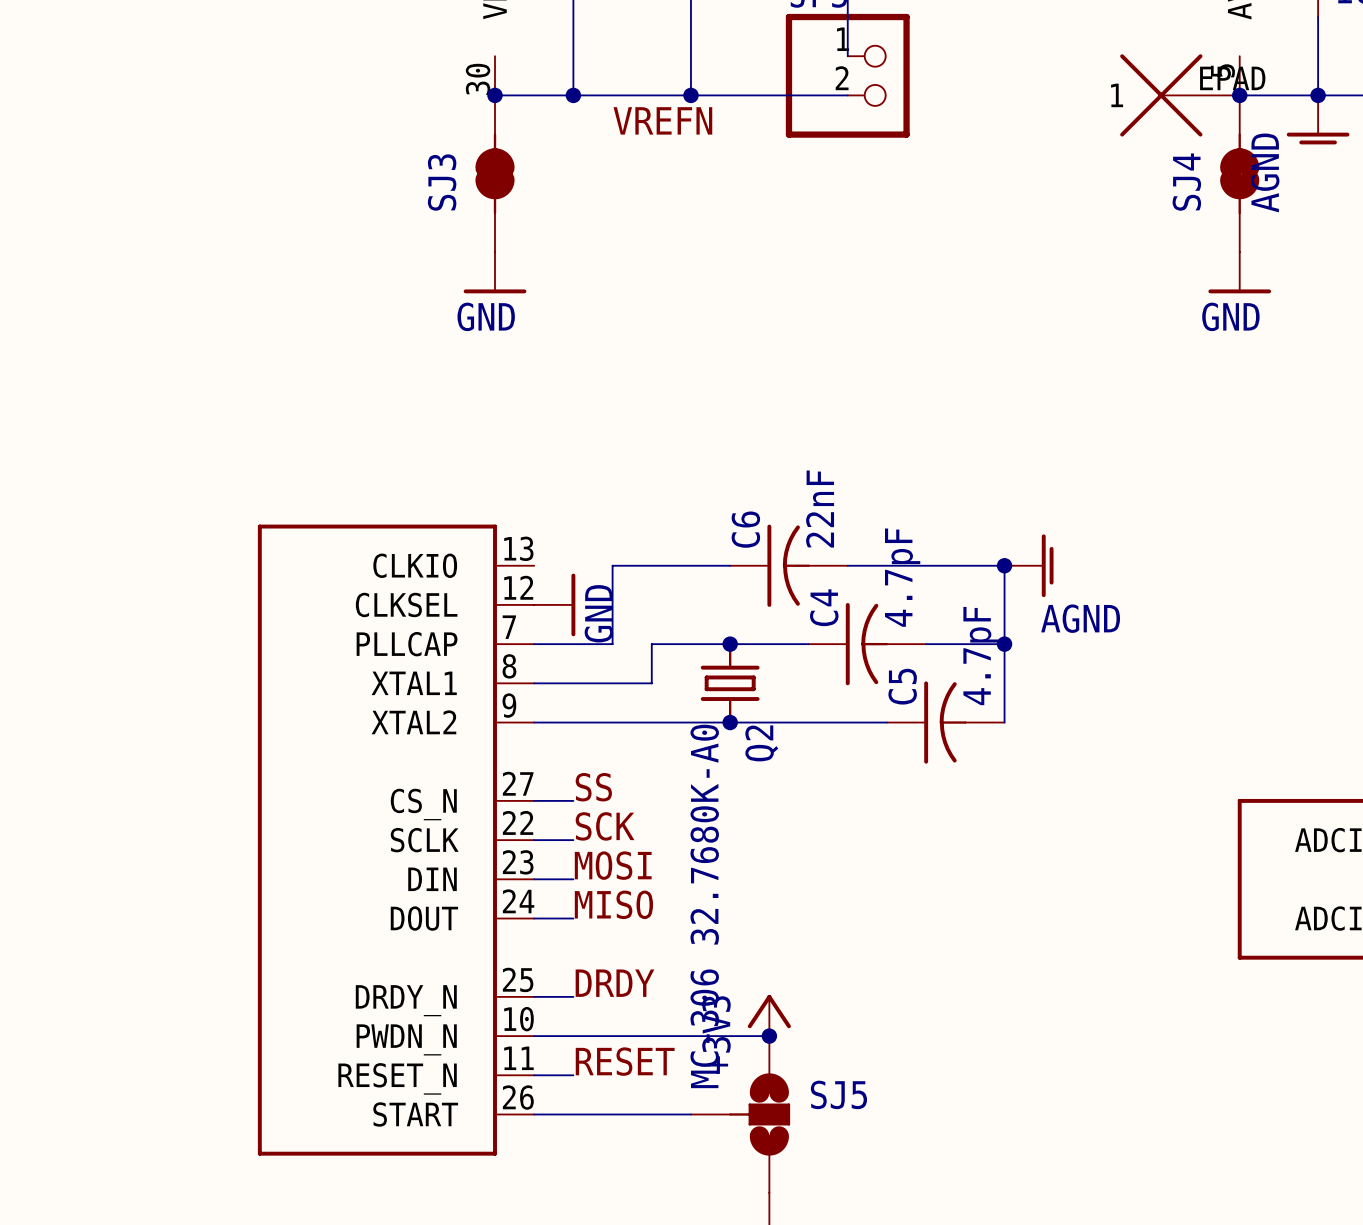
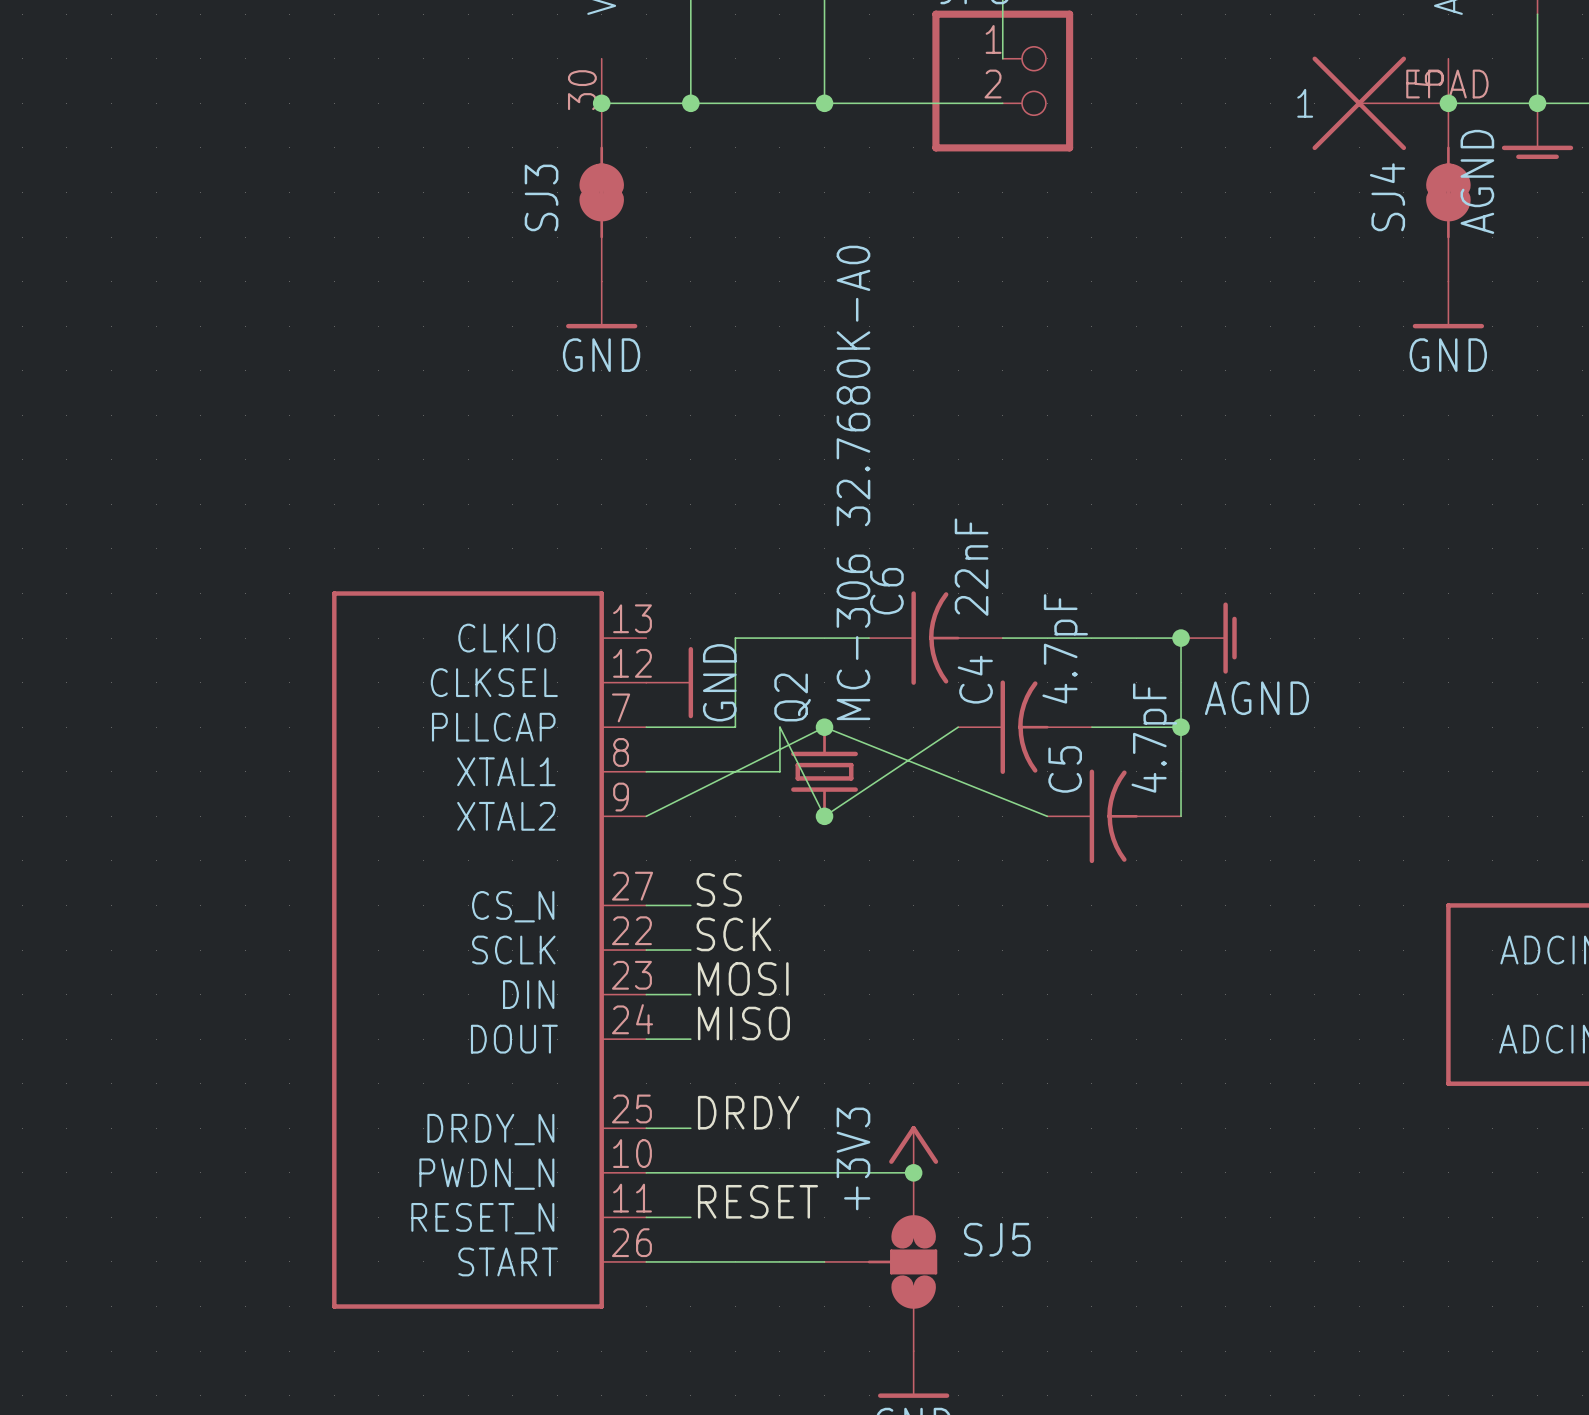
label: VREFN (662, 120) -> none
wire: (651, 644) (808, 644) -> (779, 727) (824, 816) (958, 727)
junction position: (730, 644) -> (824, 727)
Q2 position: (730, 683) -> (824, 771)
wire: (534, 722) (886, 722) -> (646, 816) (824, 727) (1047, 816)
junction position: (730, 722) -> (824, 816)
Q2 name position: Q2 (761, 743) -> Q2 (792, 697)
Q2 value position: MC-306 32.7680K-A0 (704, 906) -> MC-306 32.7680K-A0 (853, 482)

